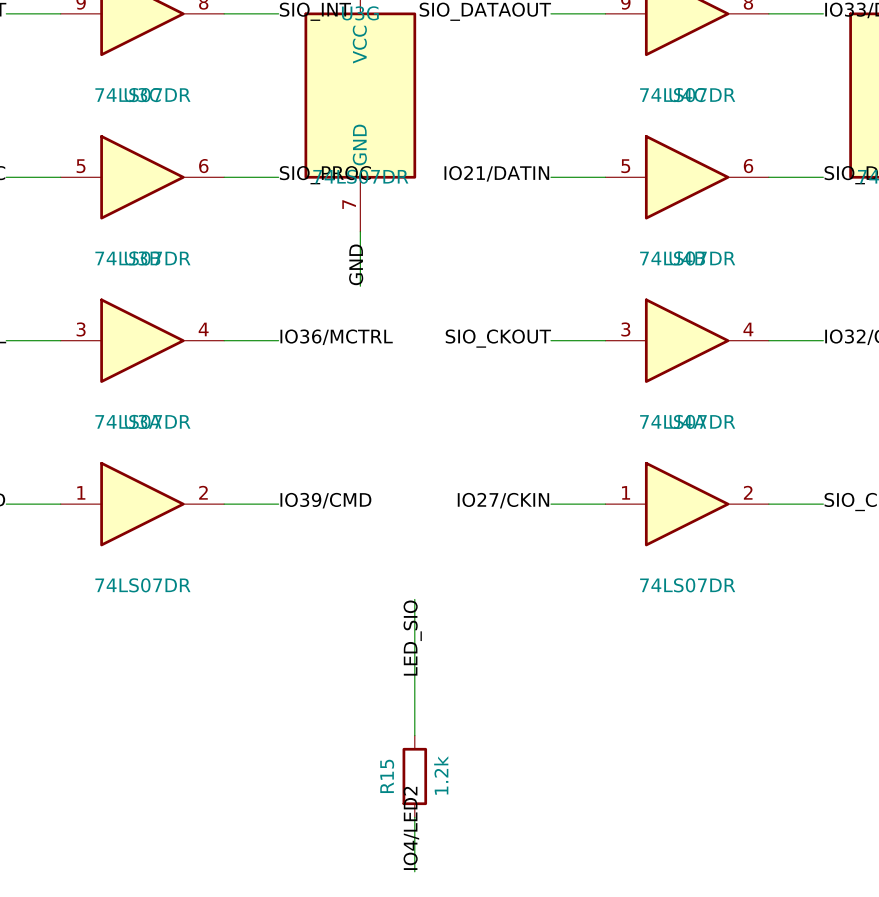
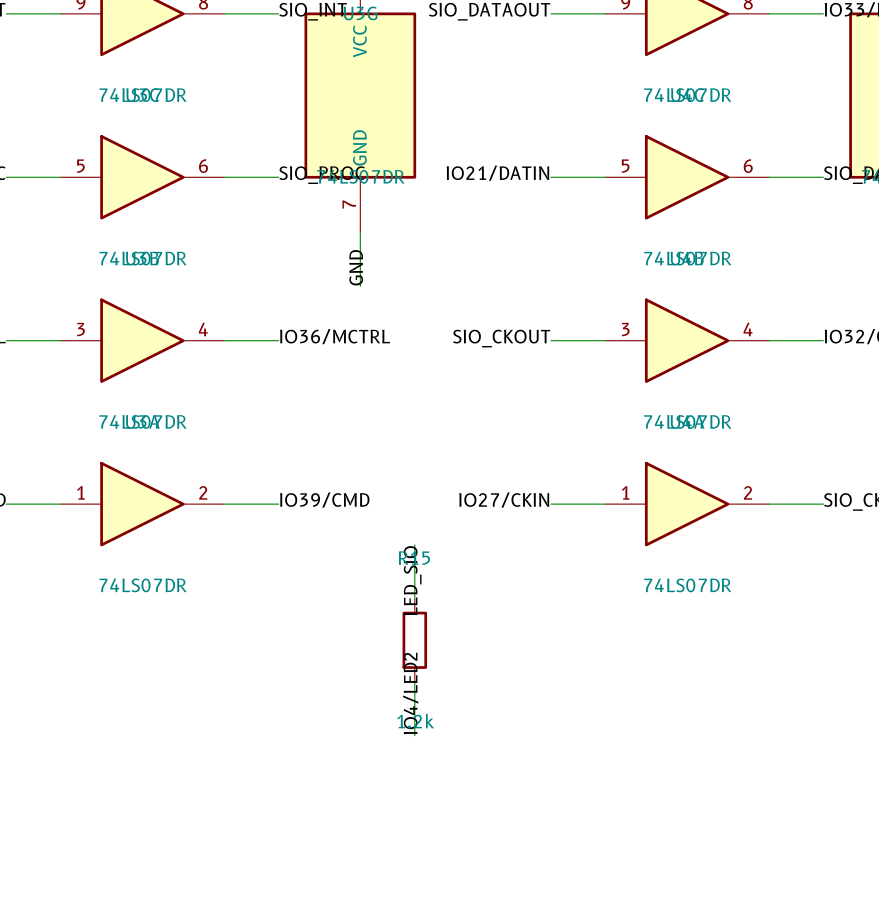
wire: (414, 599) (414, 681) -> (414, 599) (414, 544)
label position: LED_SIO (412, 638) -> LED_SIO (412, 580)
R15 value rotation: 0° (441, 775) -> 90° clockwise (415, 721)
R15 value position: 1.2k (441, 775) -> 1.2k (415, 721)
R15 name rotation: 0° (387, 776) -> 90° clockwise (414, 558)
R15 name position: R15 (387, 776) -> R15 (414, 558)
R15 position: (414, 776) -> (414, 640)
wire: (414, 817) (414, 871) -> none
label position: IO4/LED2 (411, 828) -> IO4/LED2 (410, 693)

